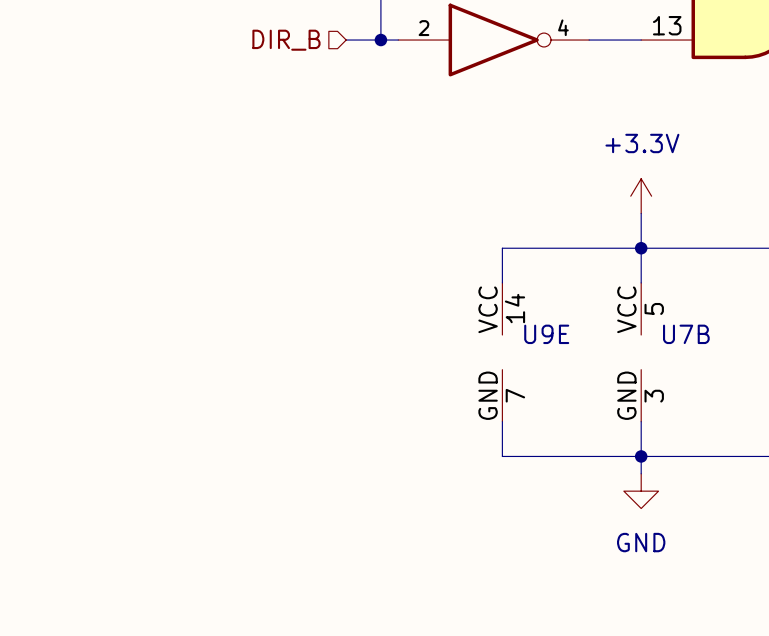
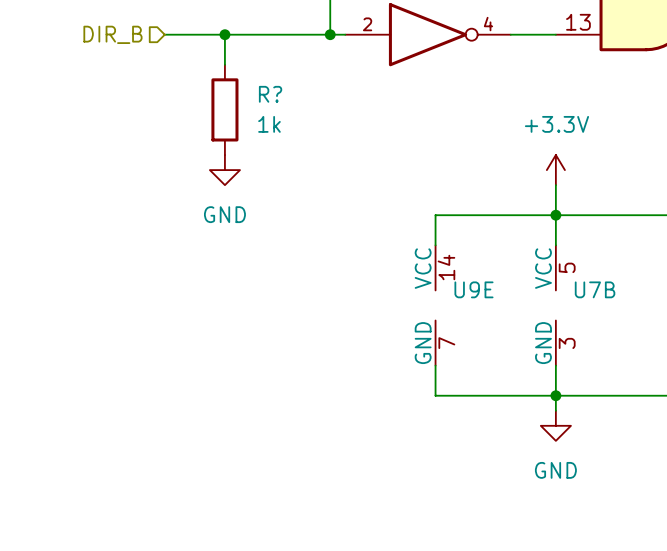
wire: none -> (164, 34) (300, 34)
wire: none -> (224, 34) (224, 64)
junction: none -> (224, 34)
hierarchical label position: DIR_B (286, 40) -> DIR_B (112, 34)
R?: none -> 1k (224, 109)
power symbol: none -> GND (224, 170)

